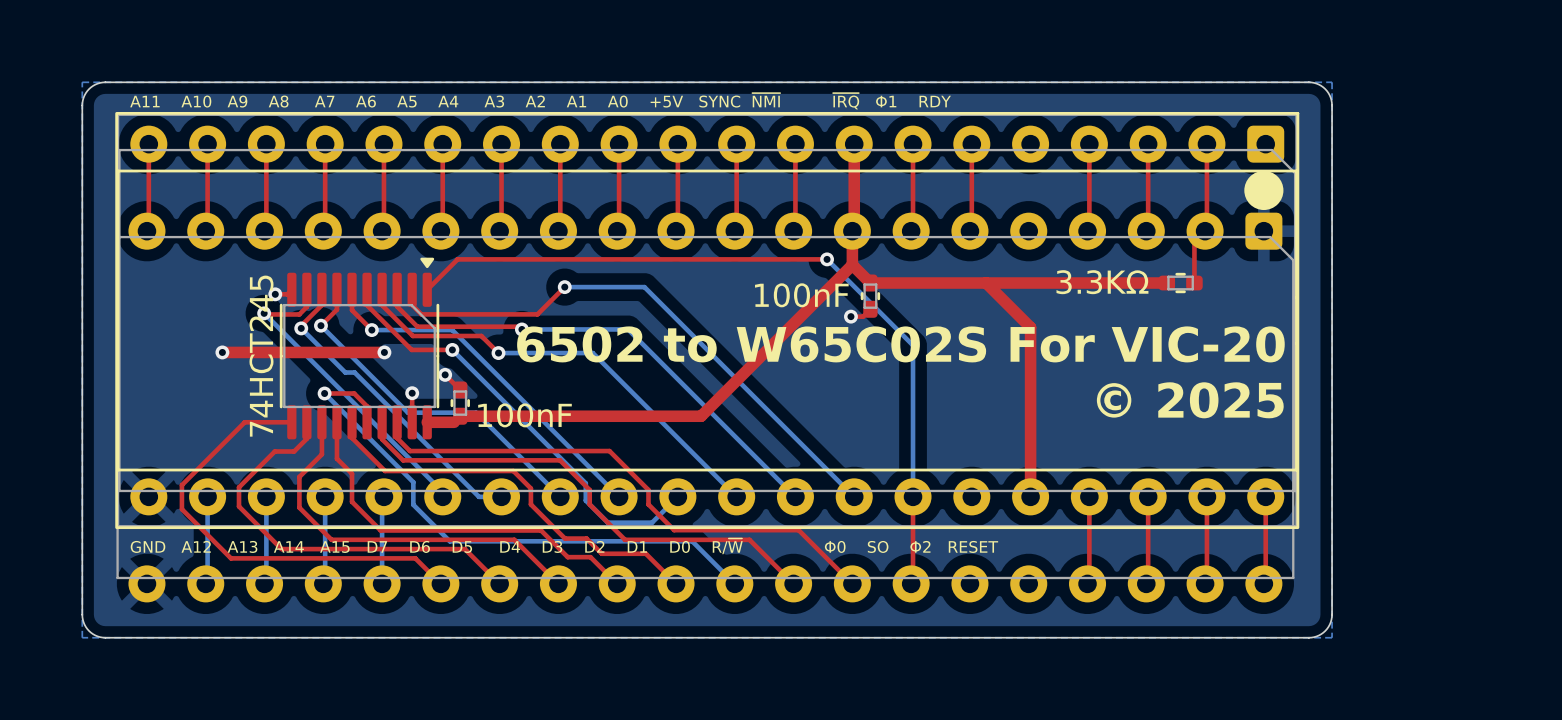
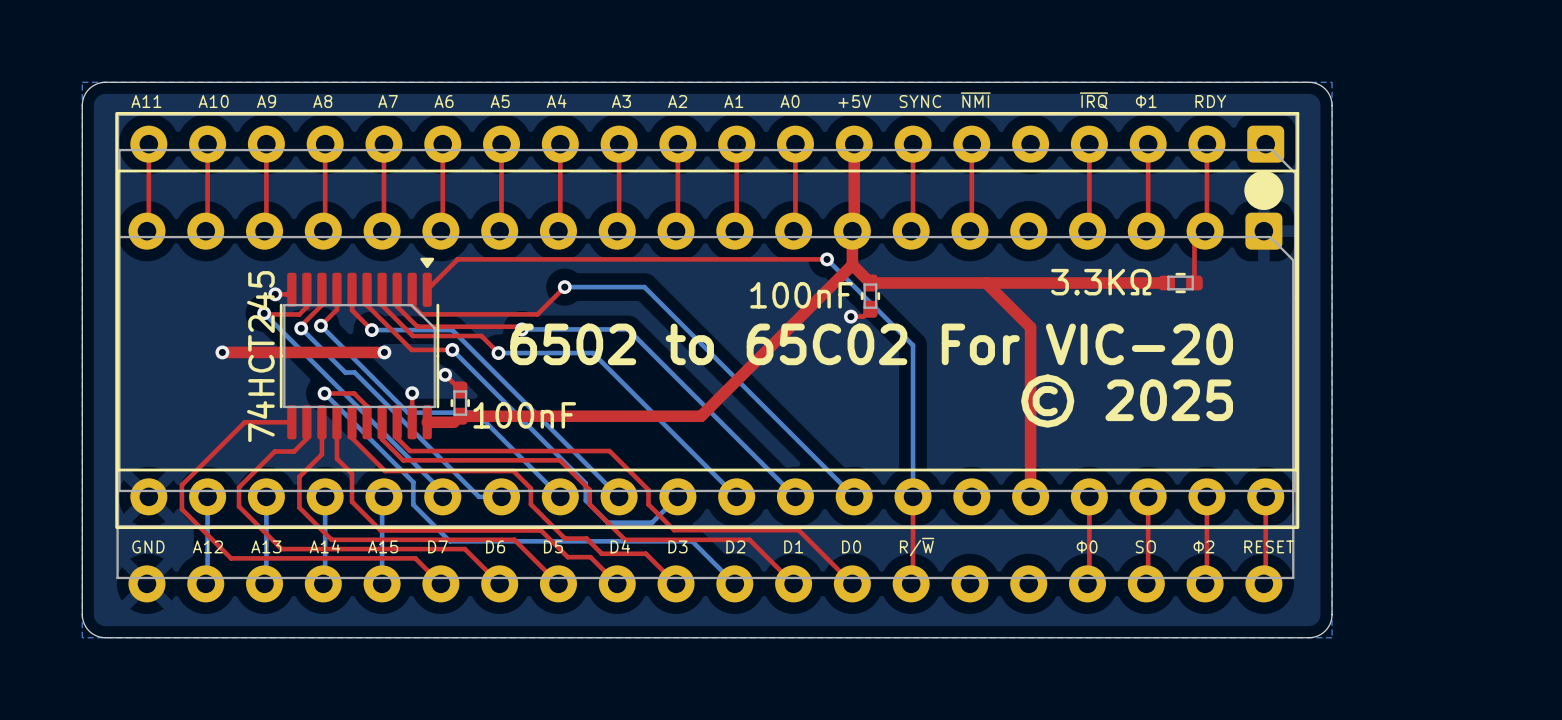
text: 6502 to W65C02S For VIC-20 (900, 344) -> 6502 to 65C02 For VIC-20 (871, 344)
text position: © 2025 (1190, 400) -> © 2025 (1127, 401)

